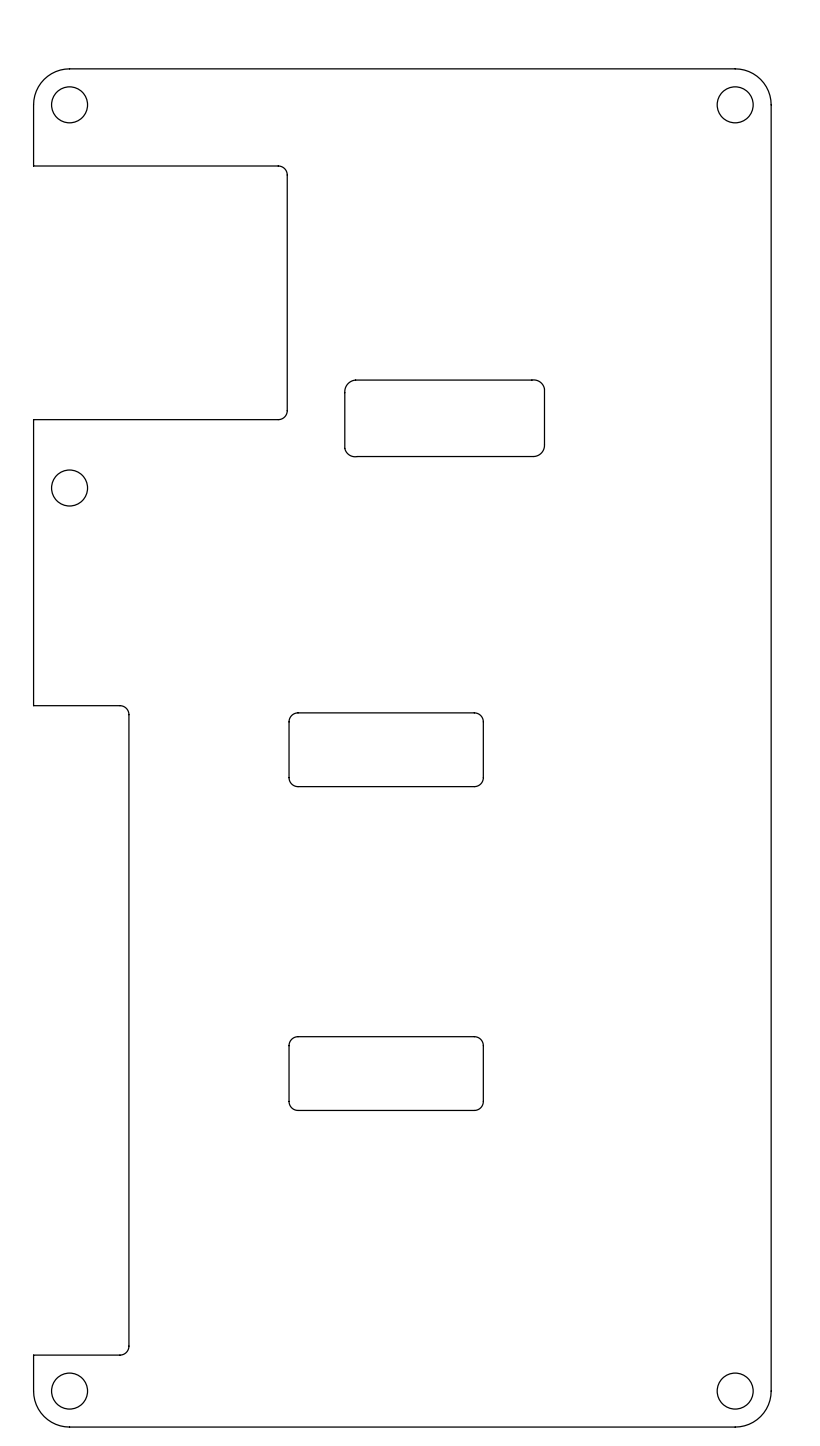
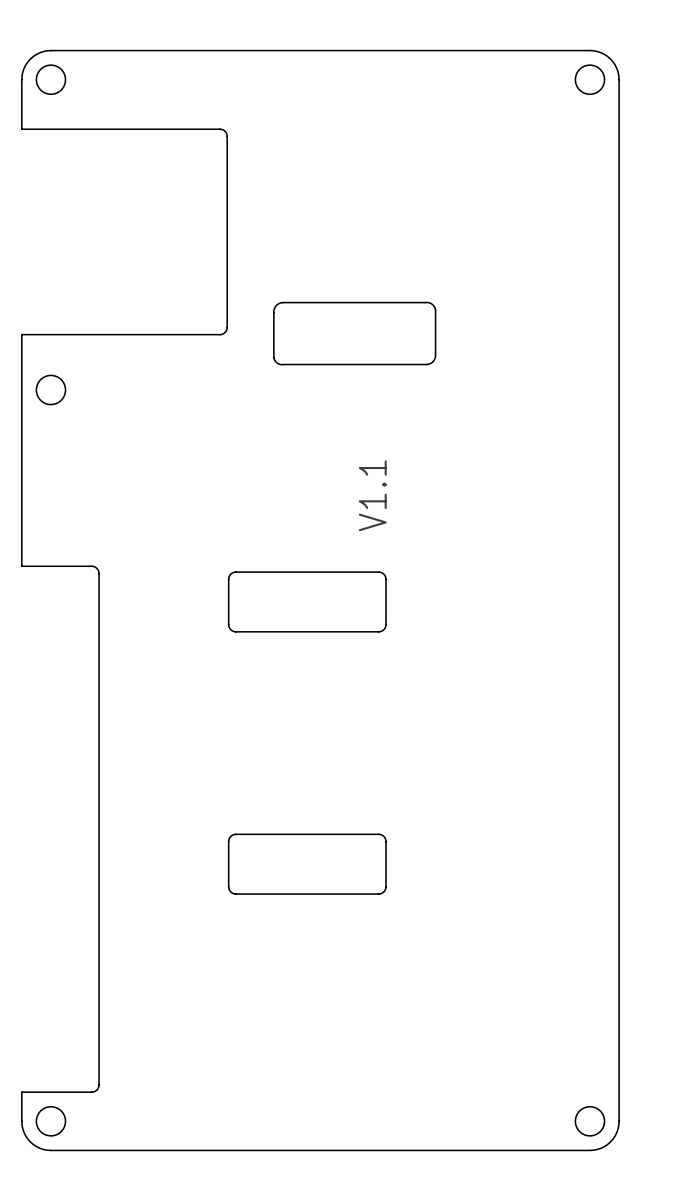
text: none -> V1.1 (372, 495)

